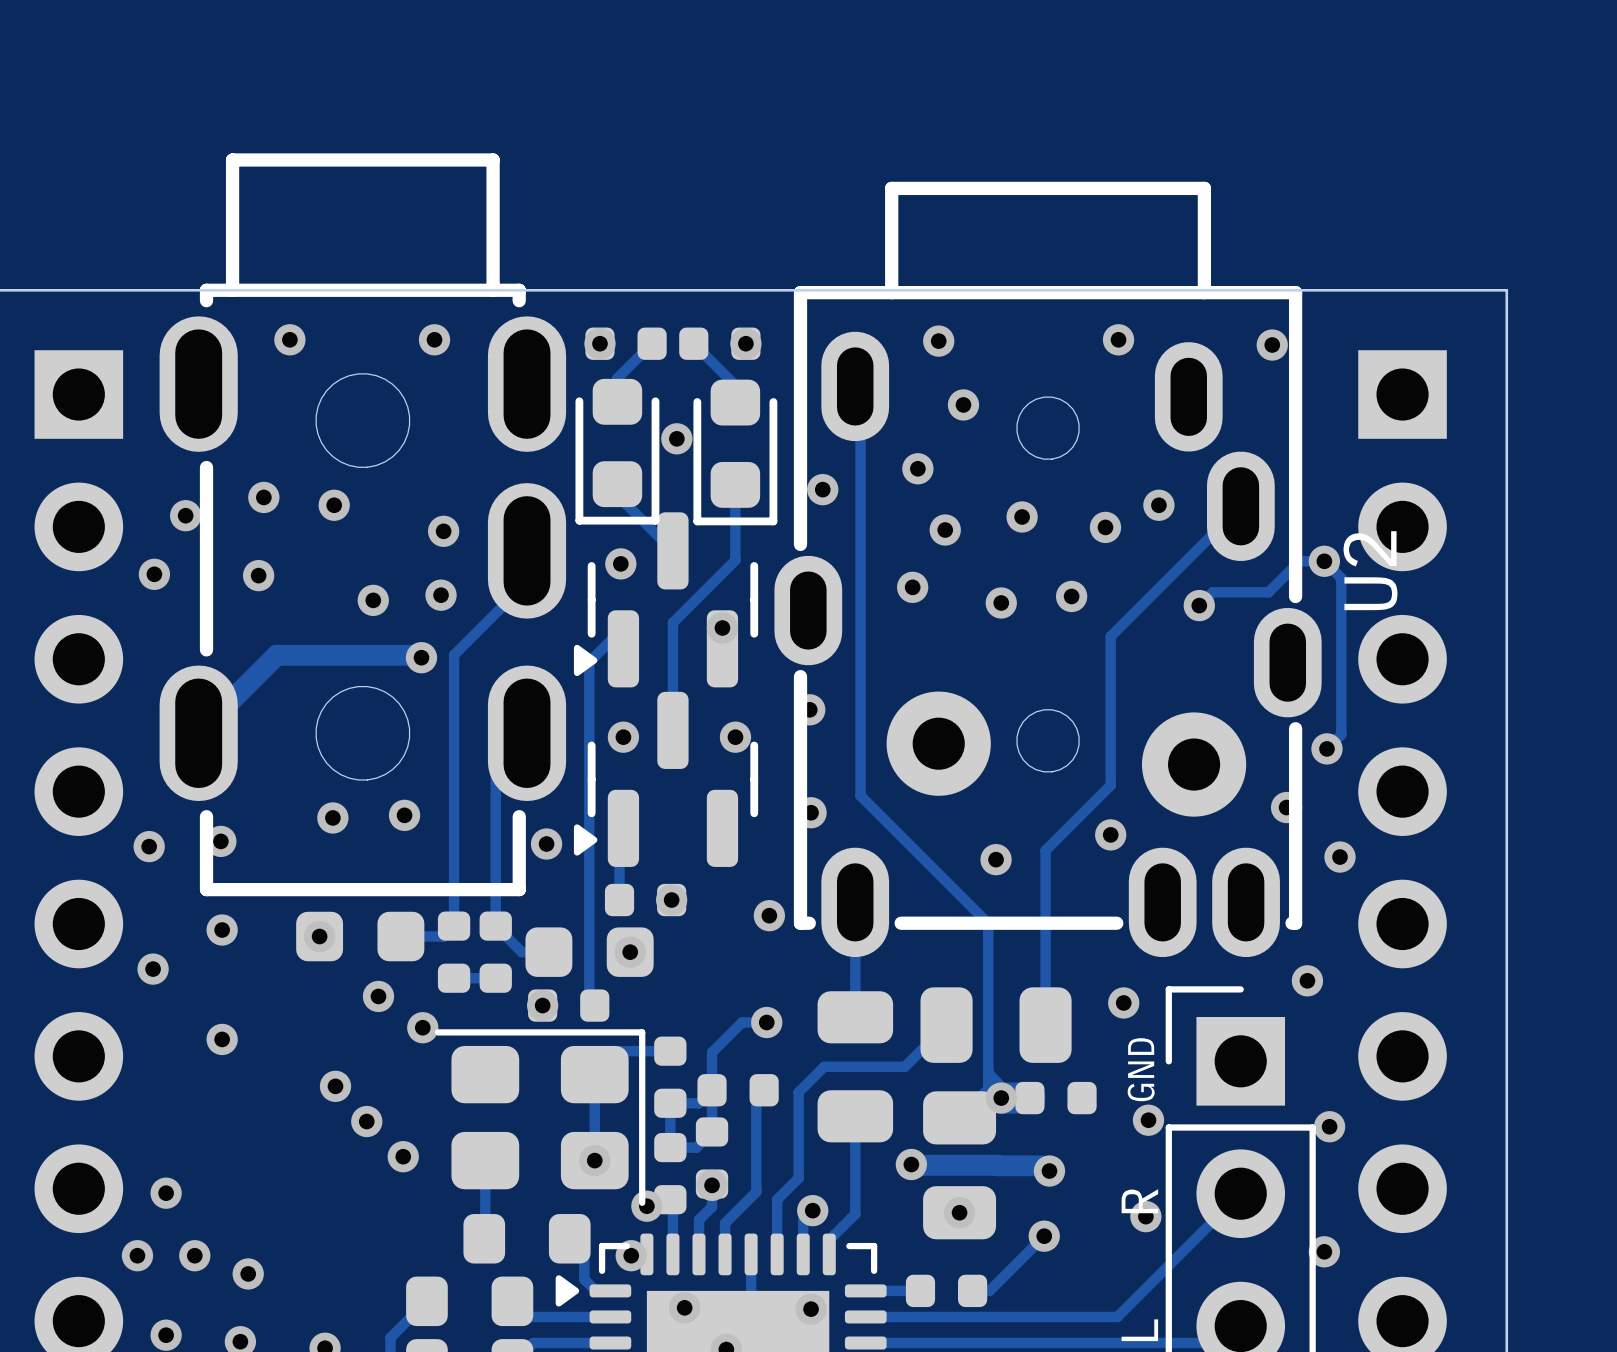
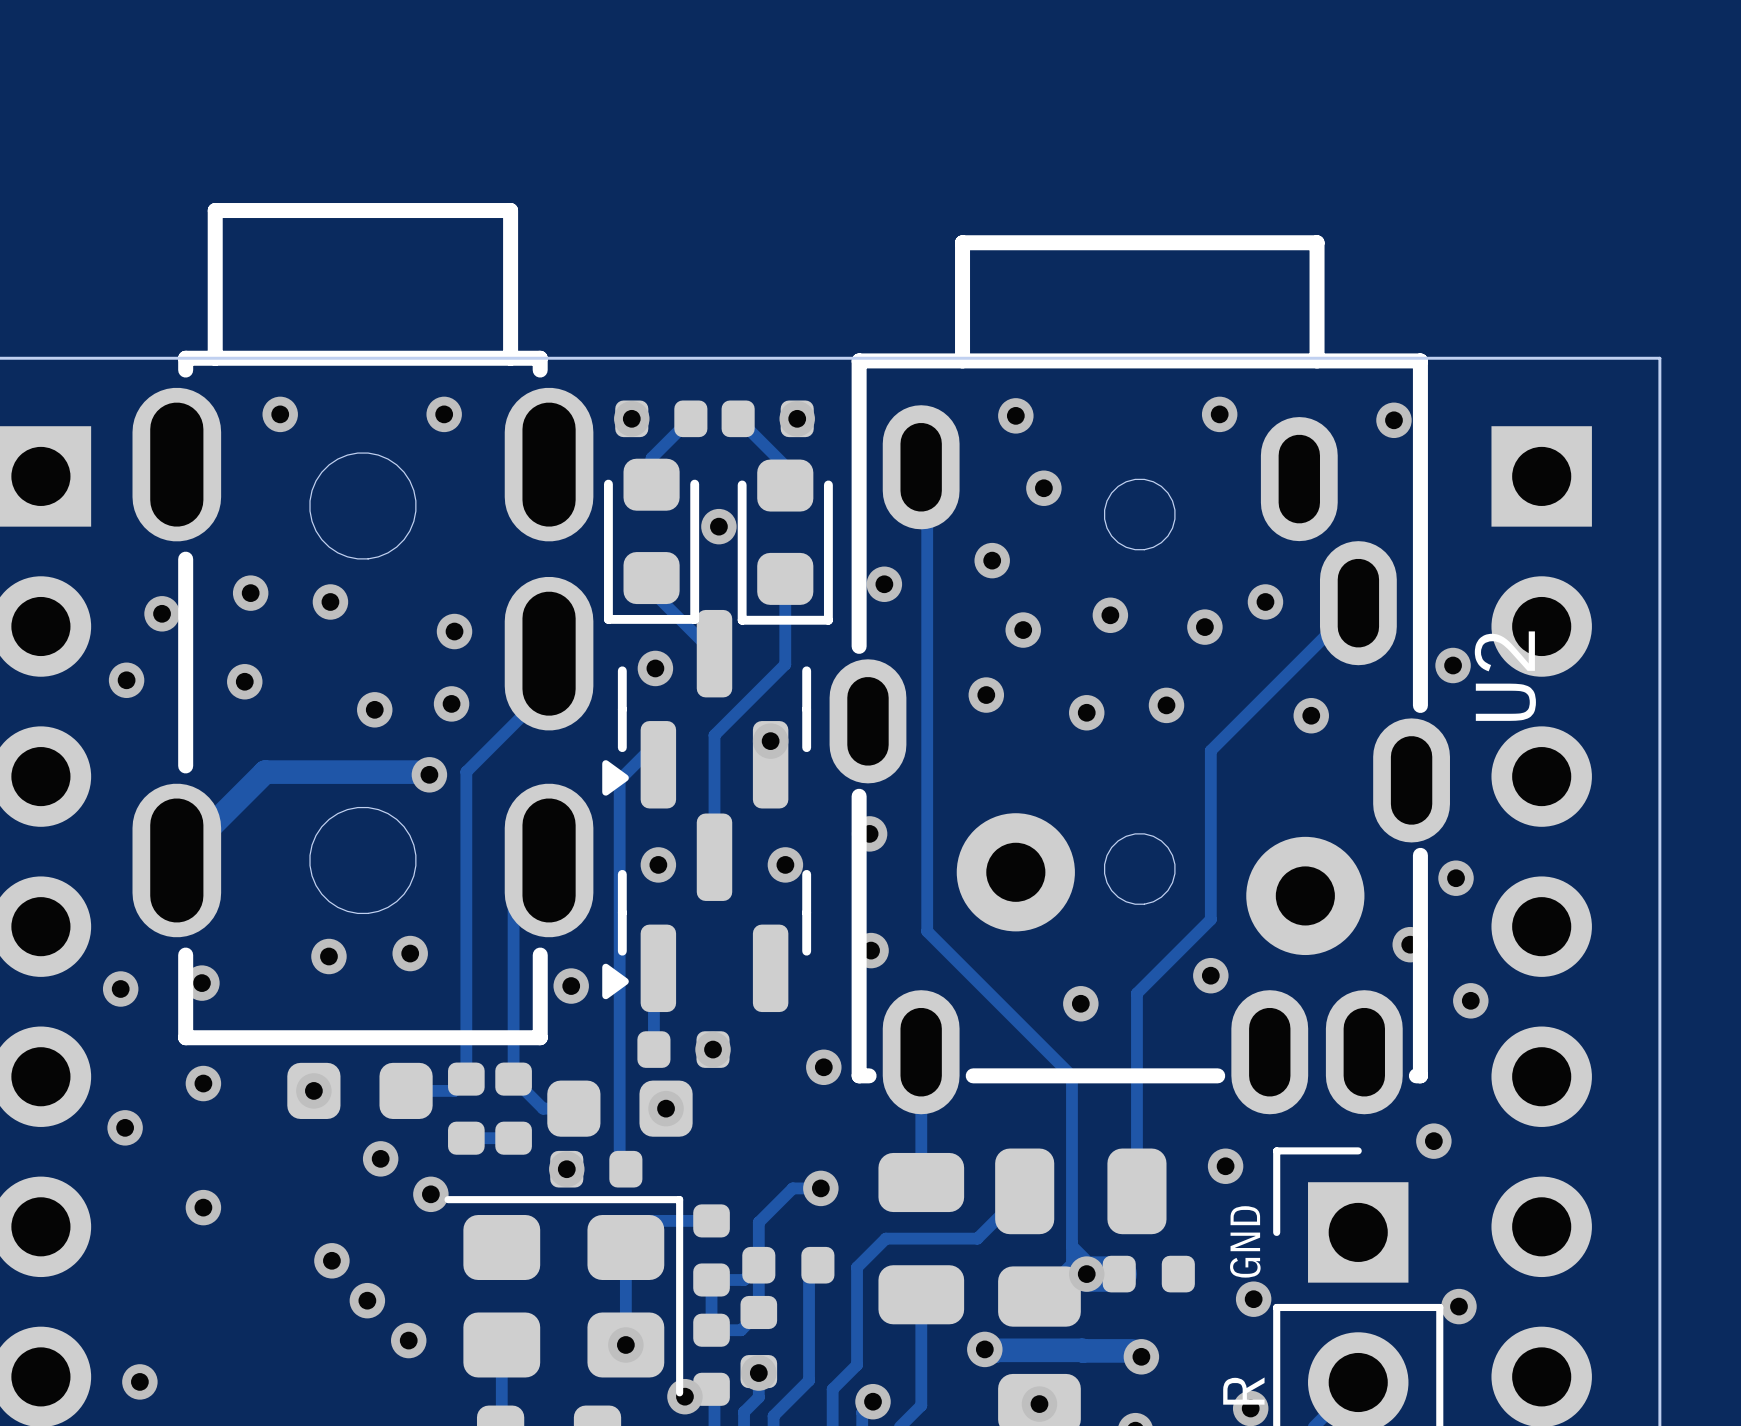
track: (1199, 605) (1212, 592) (1268, 592) (1299, 561) (1324, 561) (1341, 578) (1341, 734) (1326, 748) -> none

